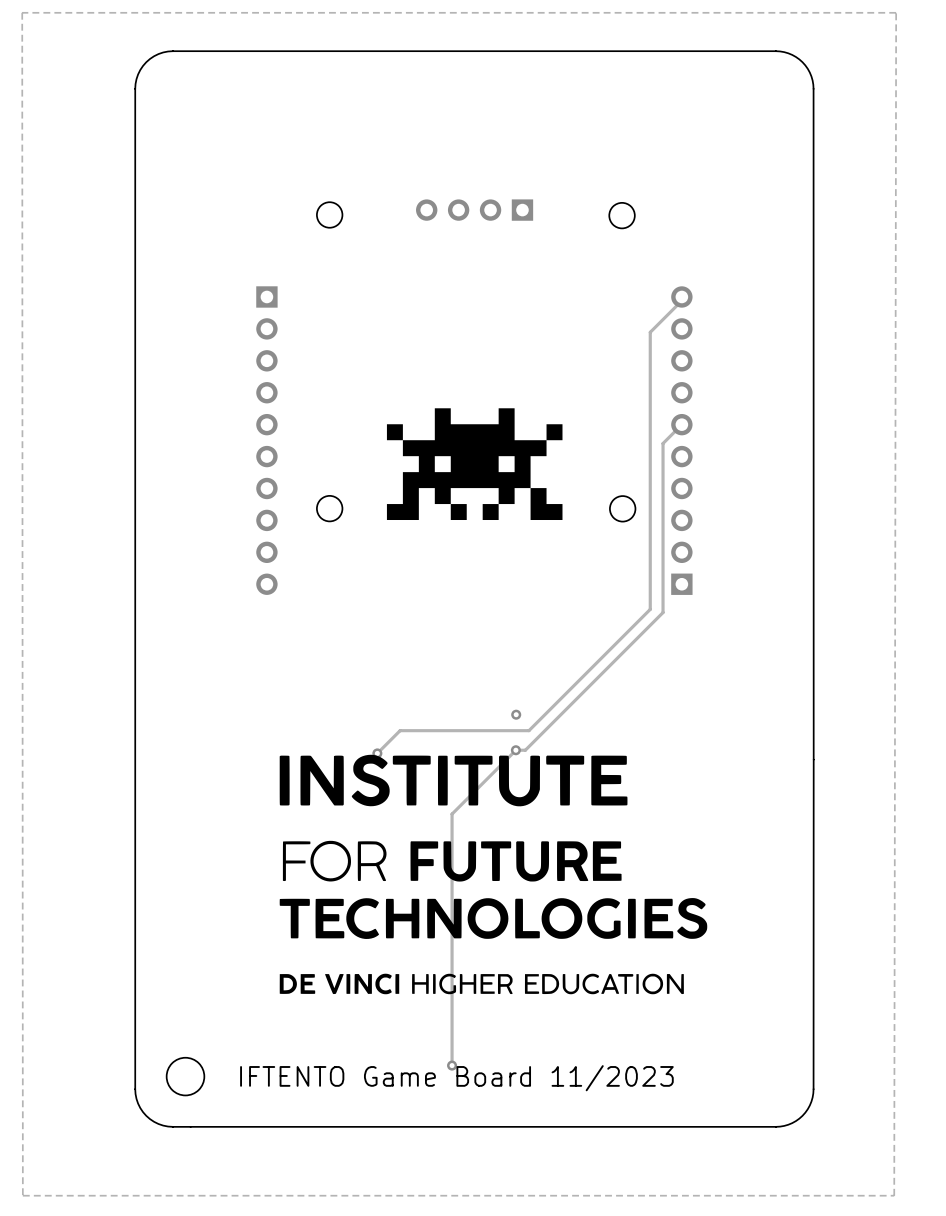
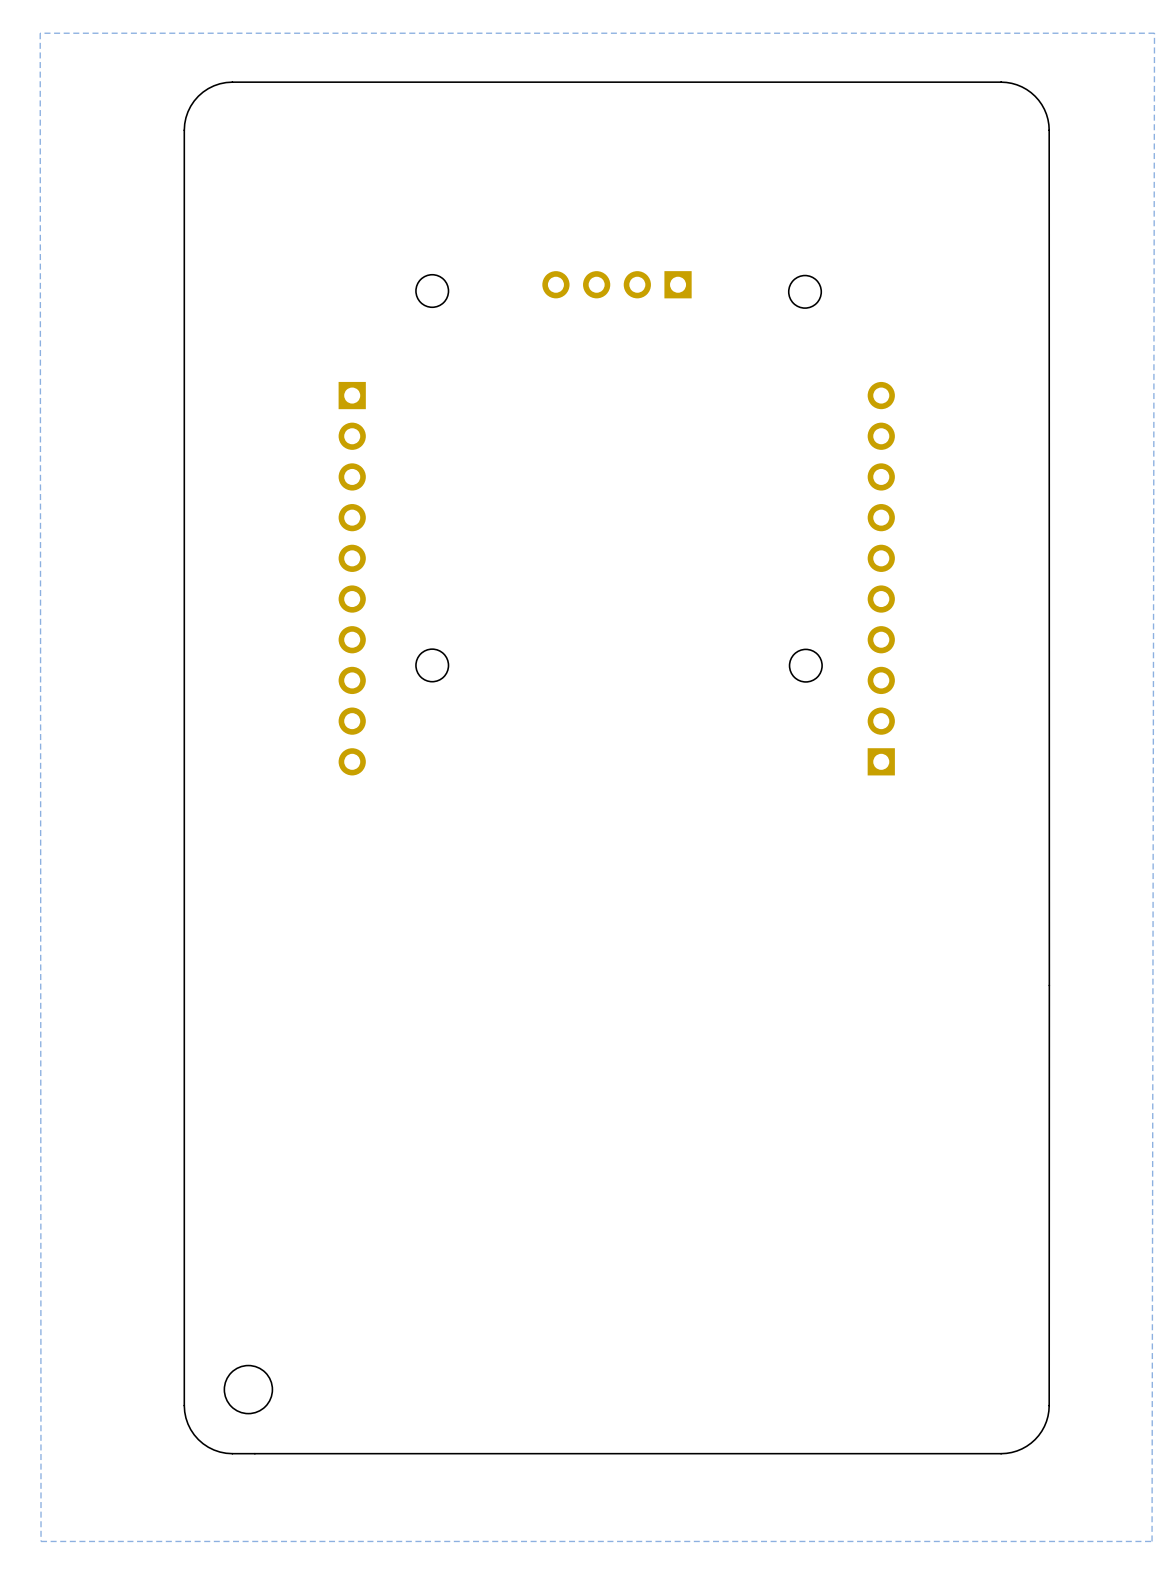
track: (681, 296) (681, 300) (650, 332) (650, 609) (528, 730) (400, 730) (377, 753) -> none
drawing: [386, 408, 563, 521] -> none
track: (681, 424) (663, 443) (663, 612) (525, 750) (515, 750) (452, 814) (452, 1065) -> none
via: (516, 714) -> none
via: (515, 750) -> none
via: (377, 753) -> none
drawing: [279, 754, 708, 995] -> none
via: (452, 1065) -> none
text: IFTENTO Game Board 11/2023 (456, 1078) -> none

